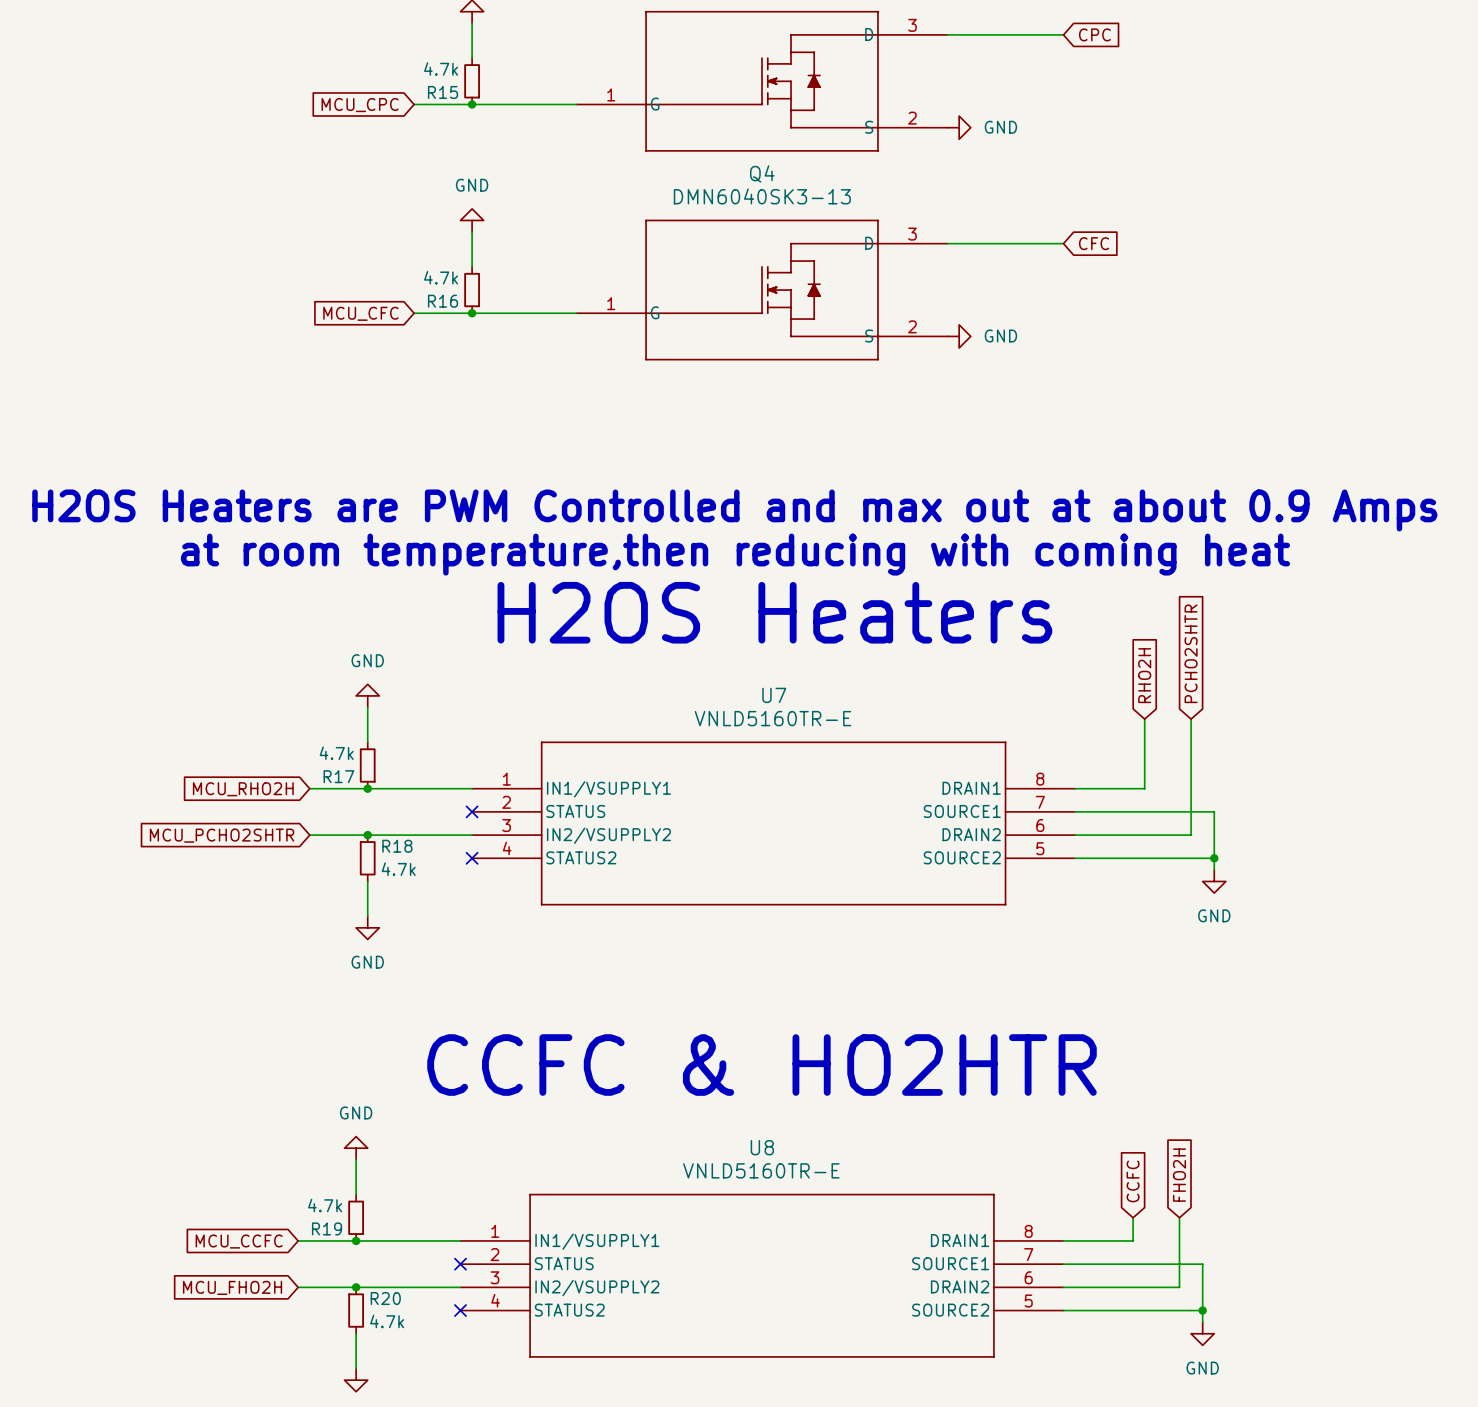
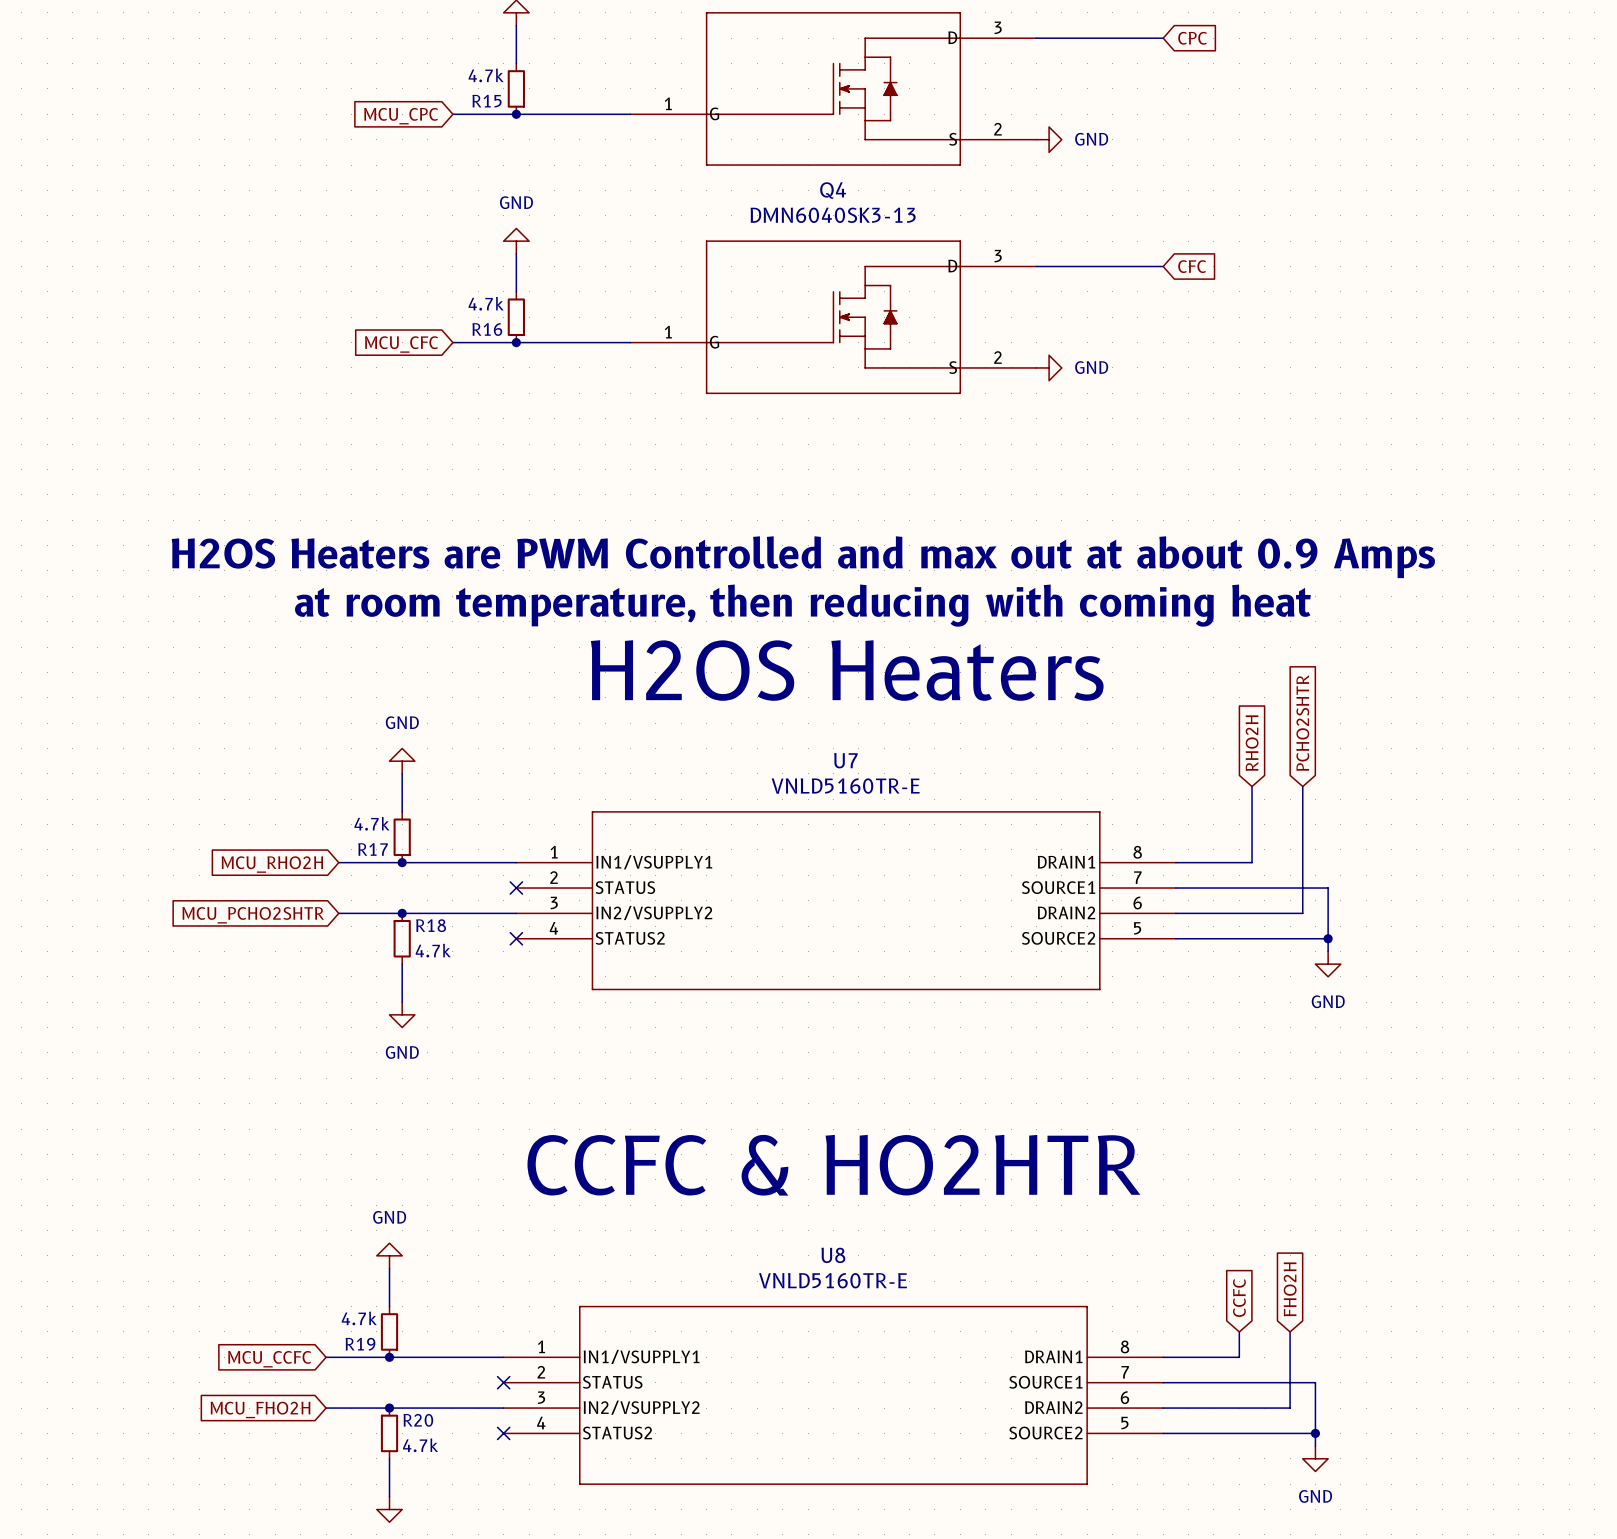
text: at room temperature,then reducing with coming heat (735, 554) -> at room temperature, then reducing with coming heat (802, 605)

